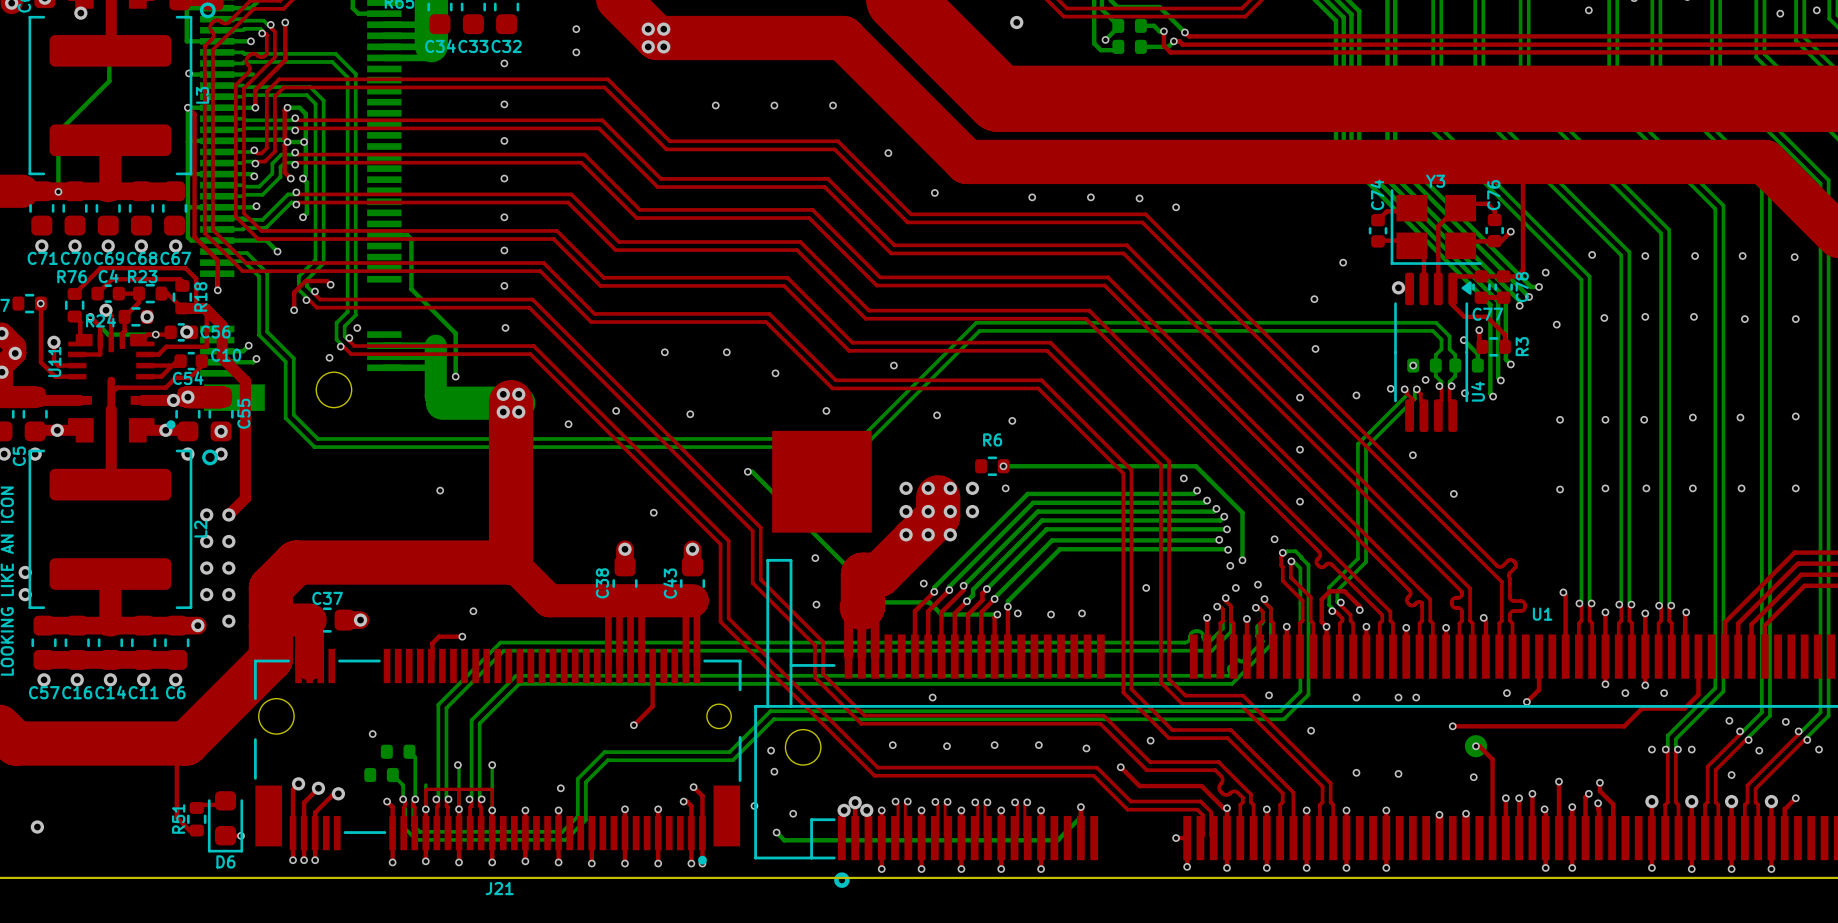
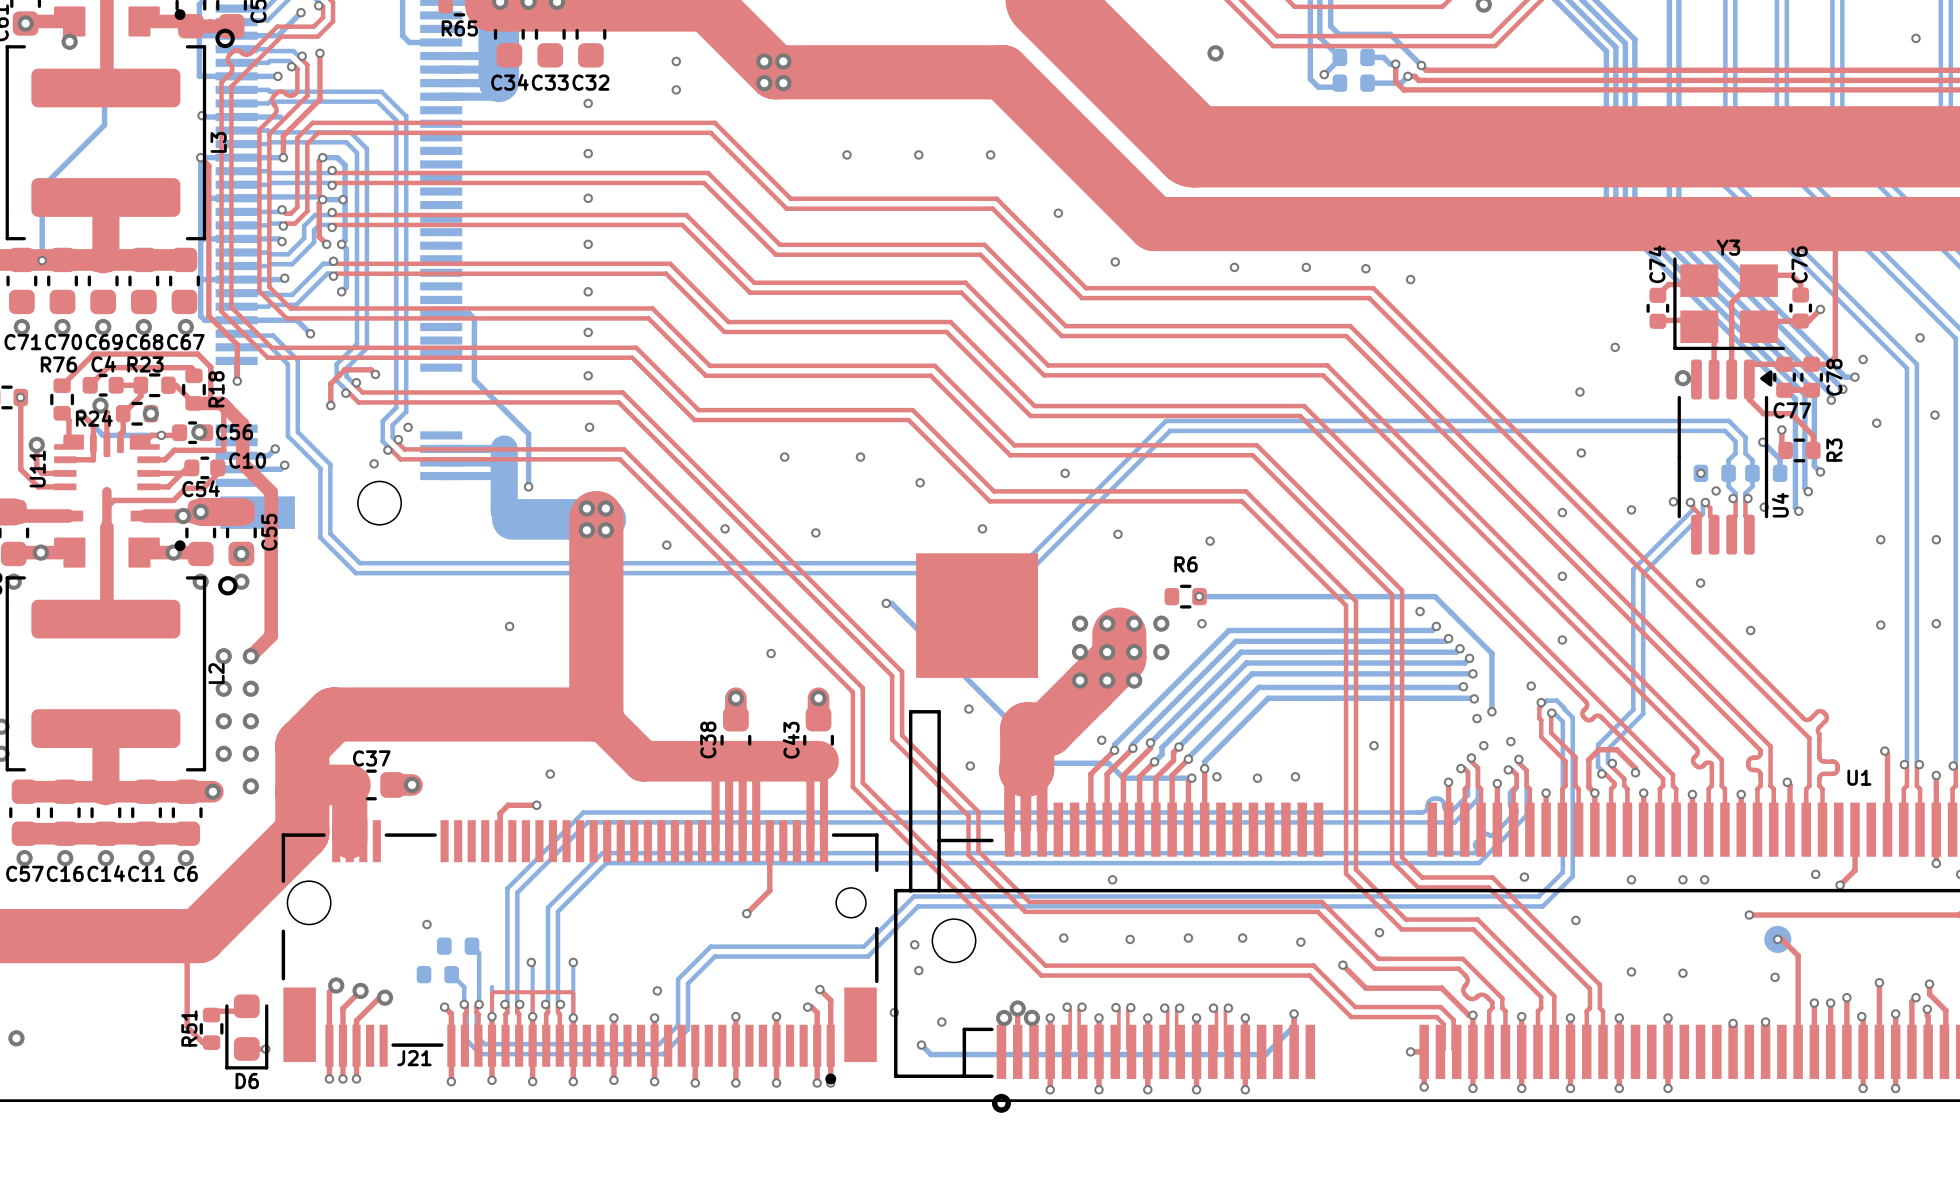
J21 name position: J21 (499, 888) -> J21 (414, 1058)

